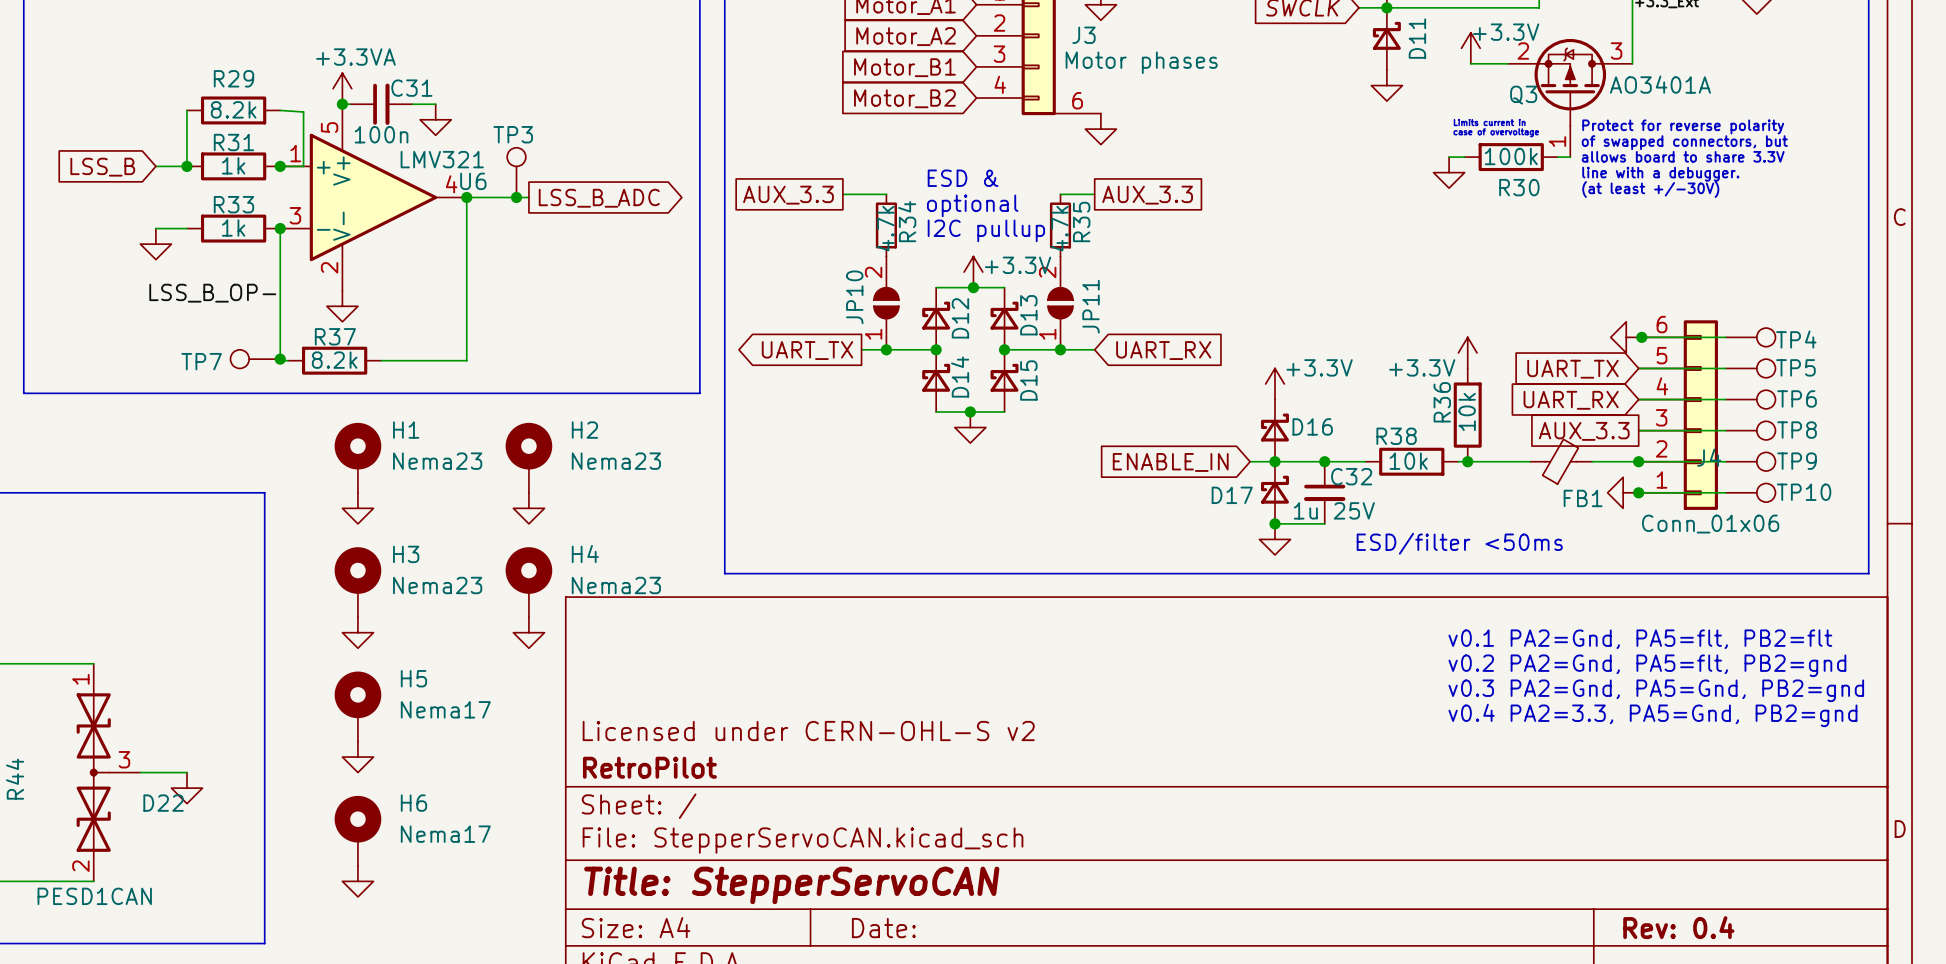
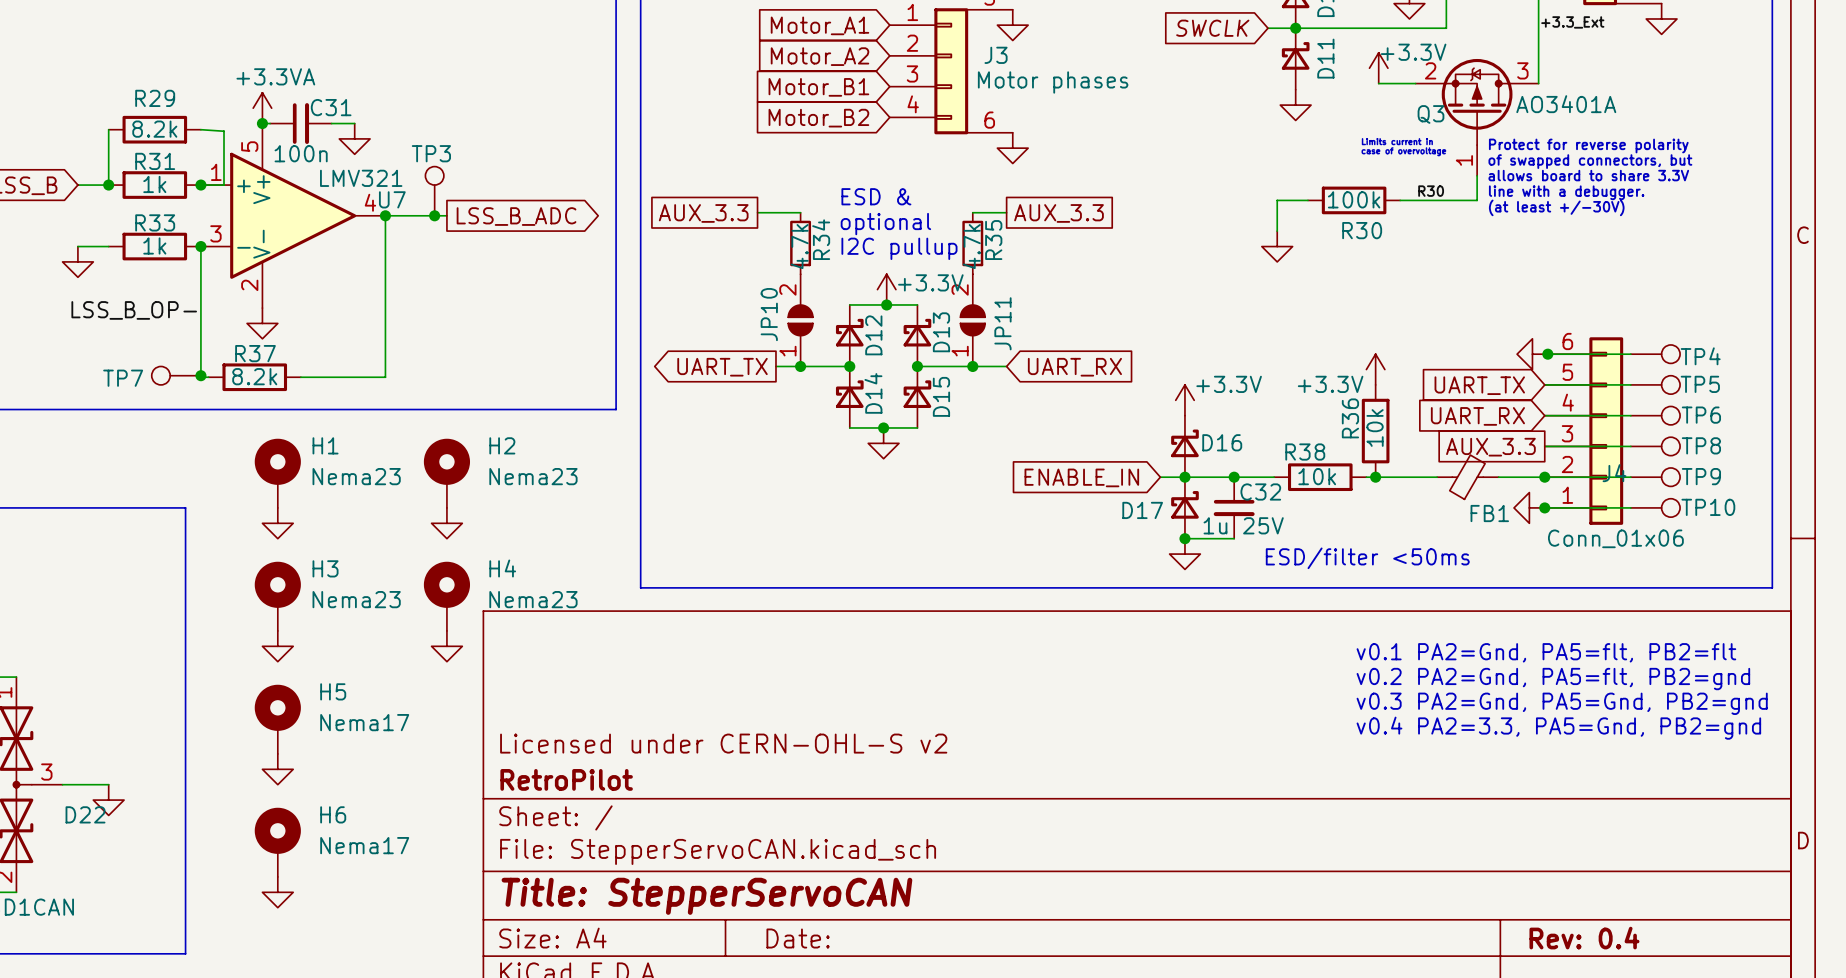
wire: (1449, 157) (1464, 157) -> none
R30 position: (1511, 157) -> (1354, 200)
wire: (1557, 157) (1570, 157) -> (1400, 200) (1477, 200) (1477, 175)
power symbol position: (1449, 172) -> (1277, 246)
label: none -> R30 (1431, 191)
U6 name: U6 (473, 181) -> U7 (392, 199)
wire: none -> (1307, 200) (1277, 200) (1277, 231)

